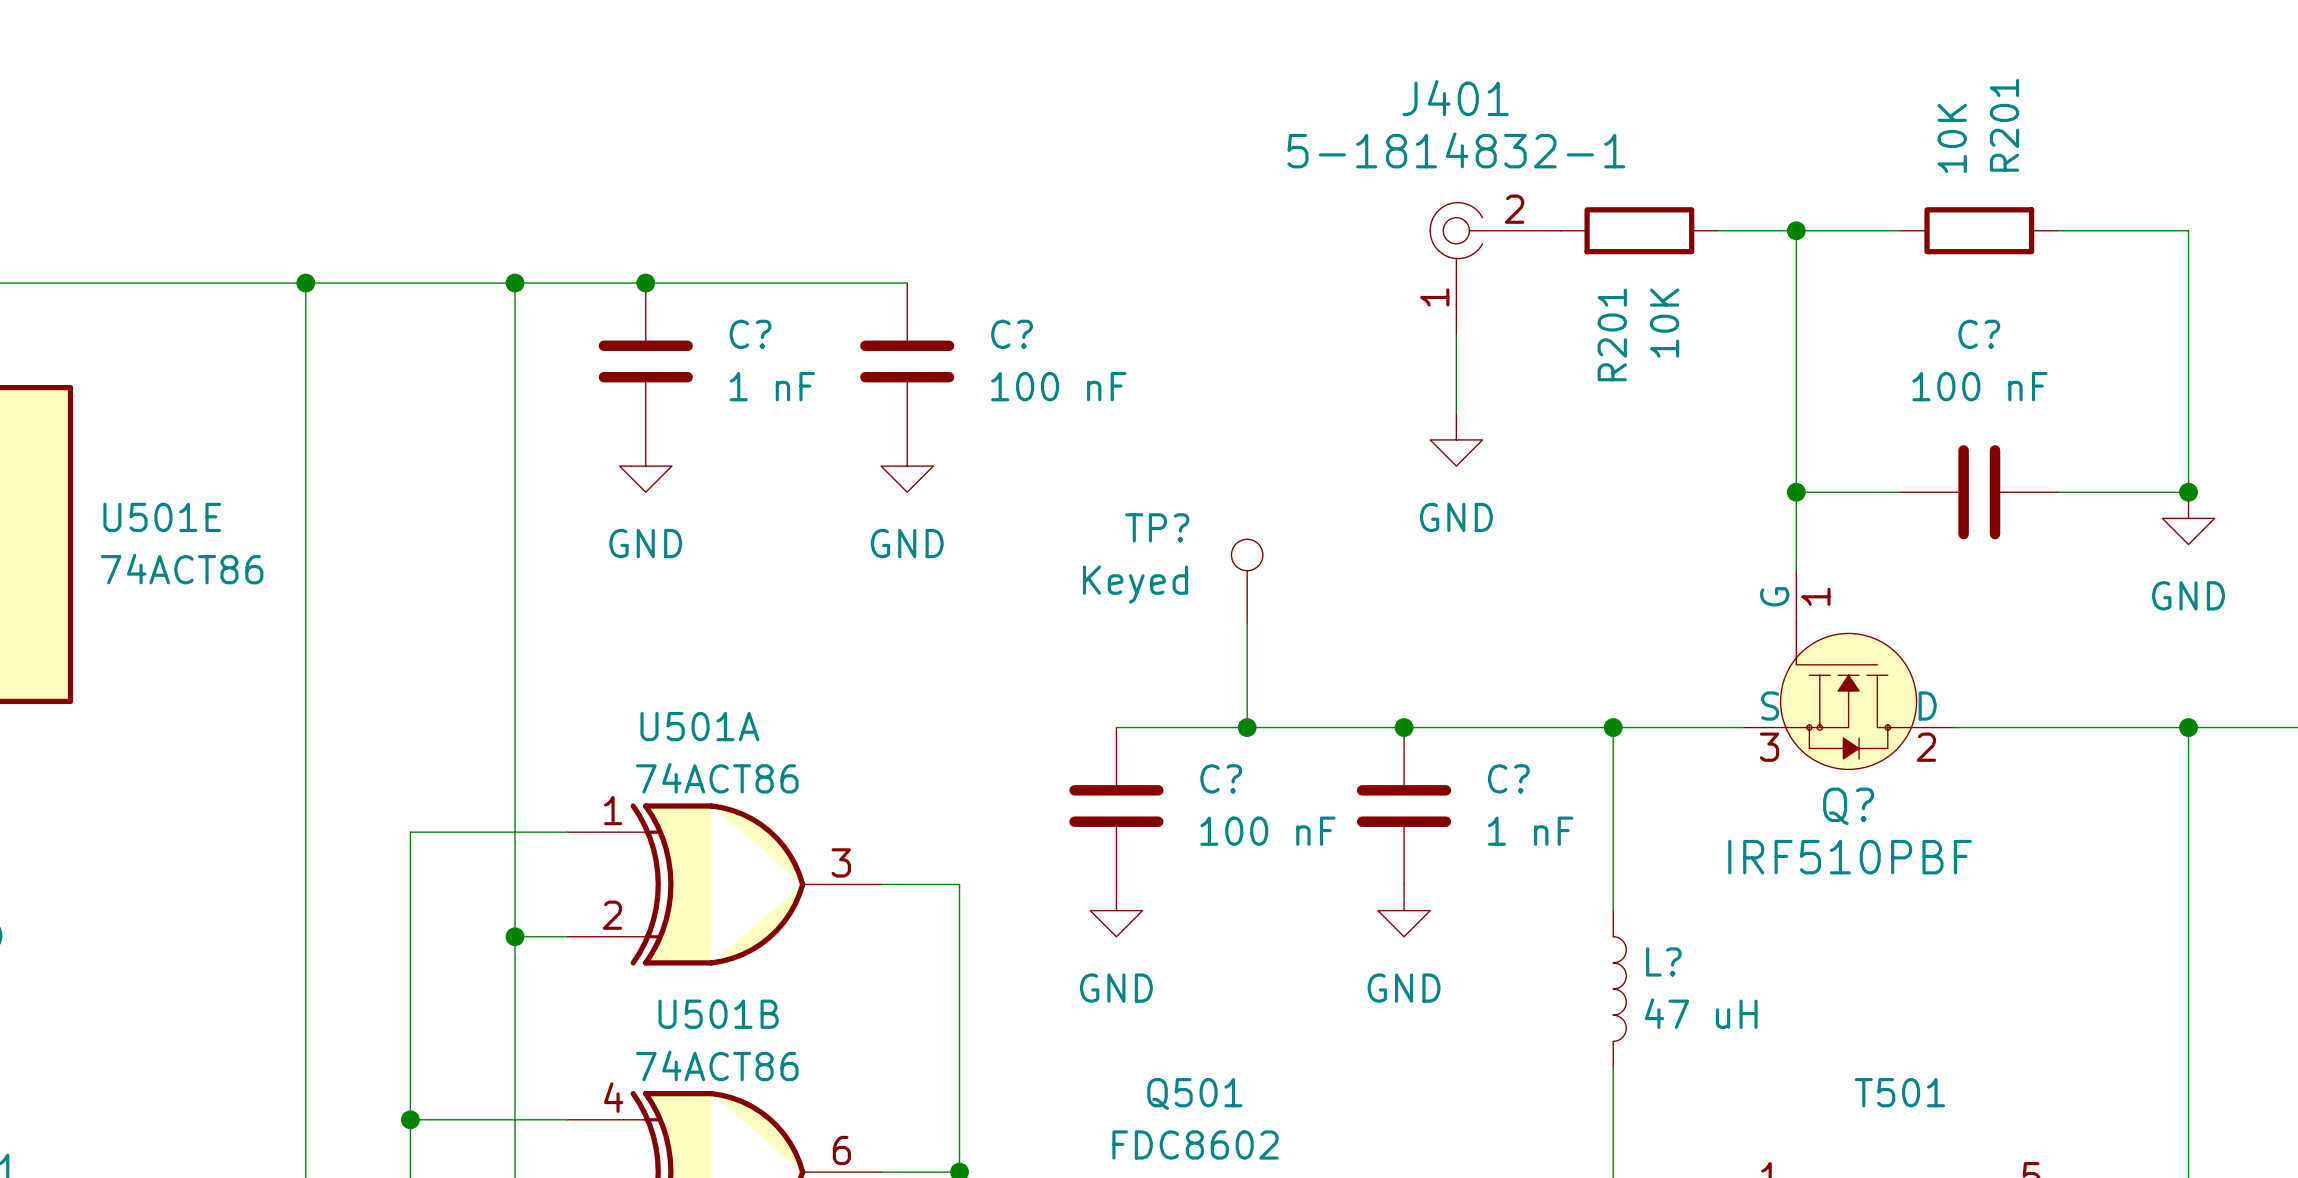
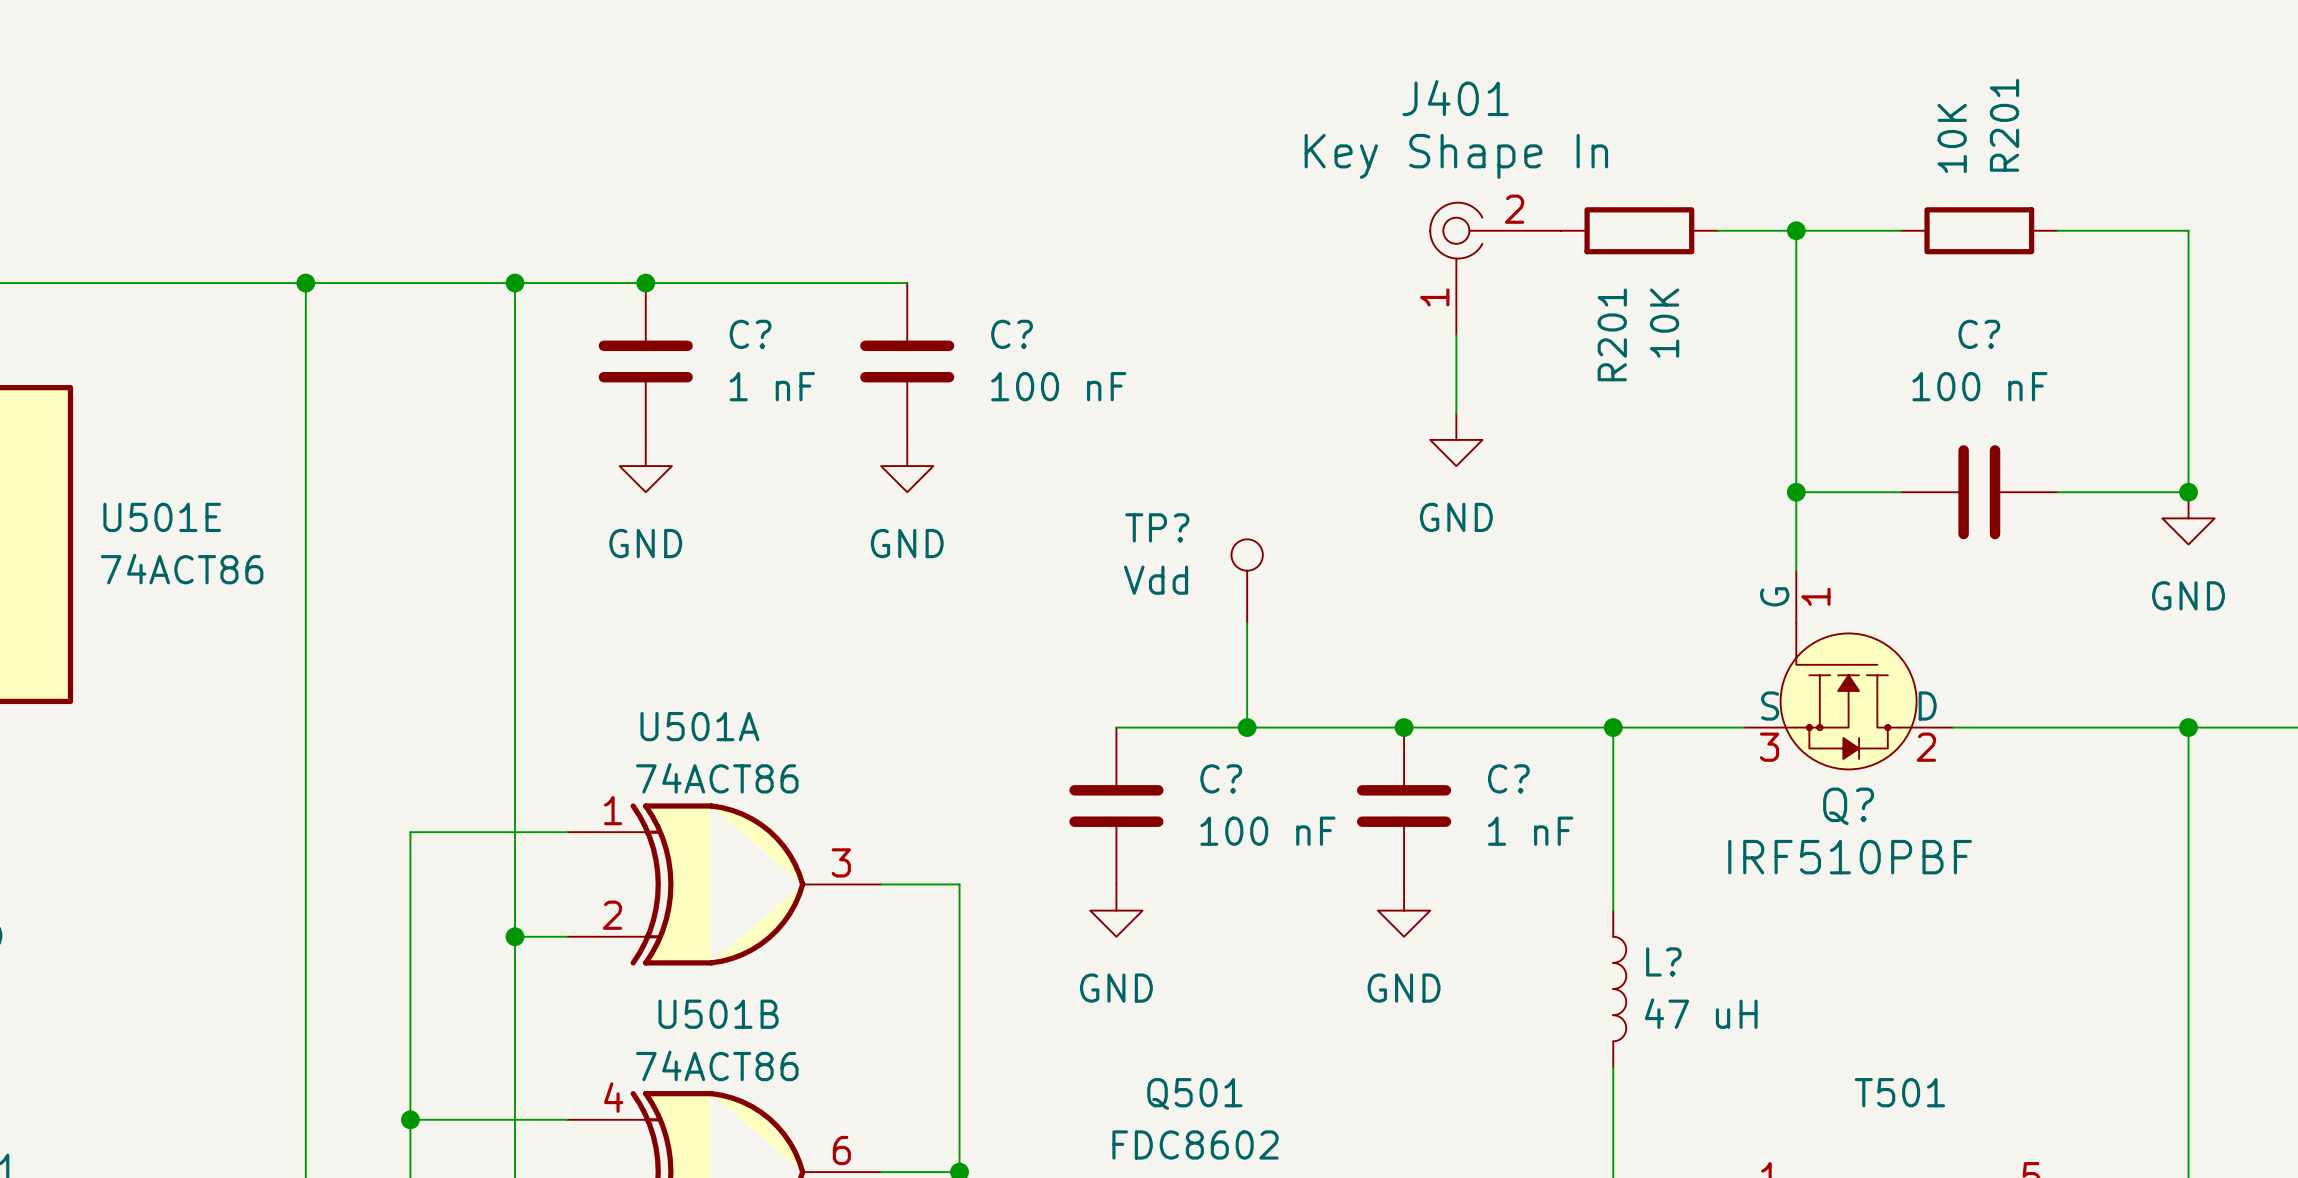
J401 value: 5-1814832-1 (1456, 150) -> Key Shape In (1456, 156)
TP? value: Keyed (1135, 584) -> Vdd (1156, 580)

